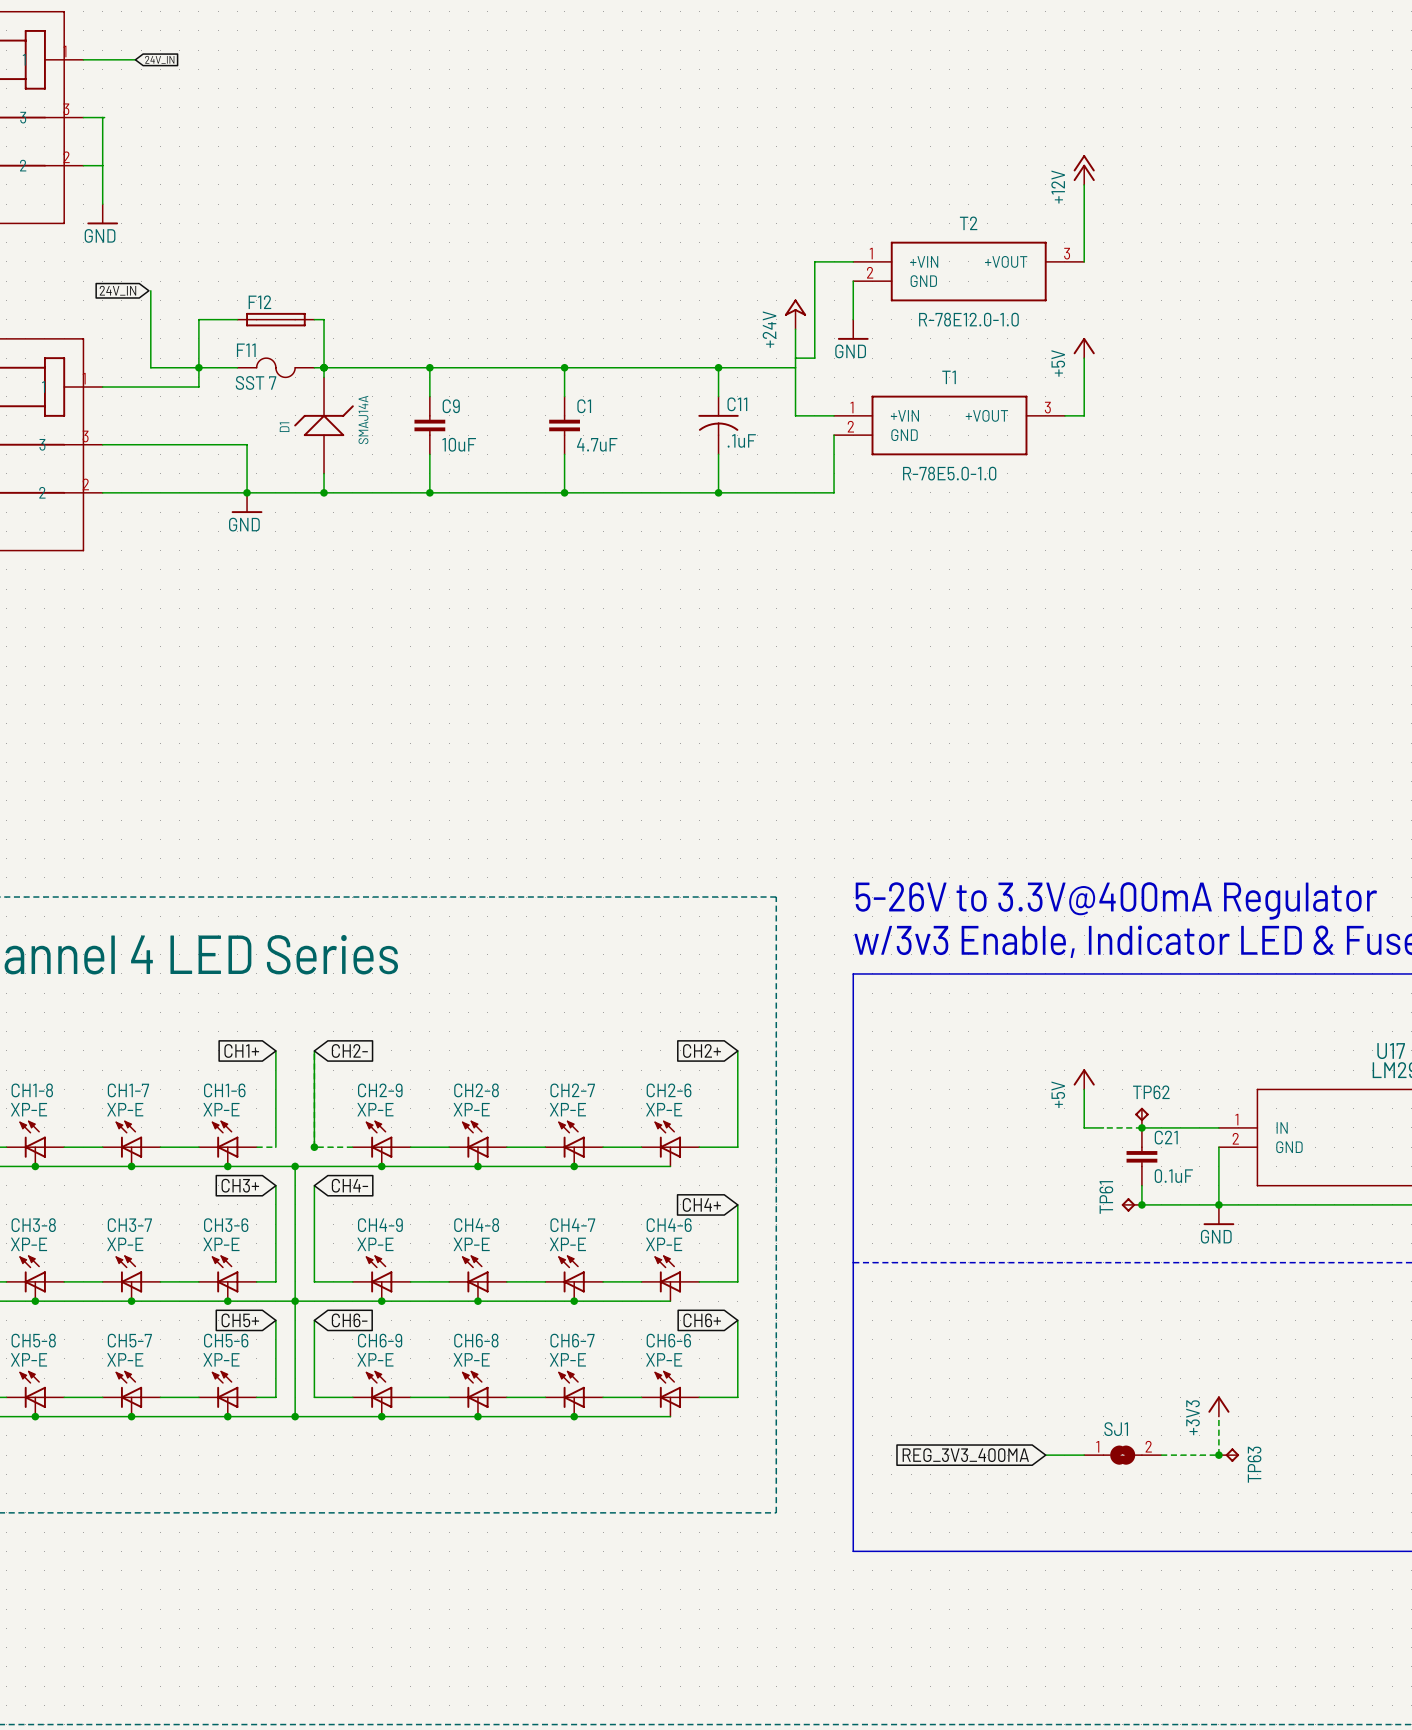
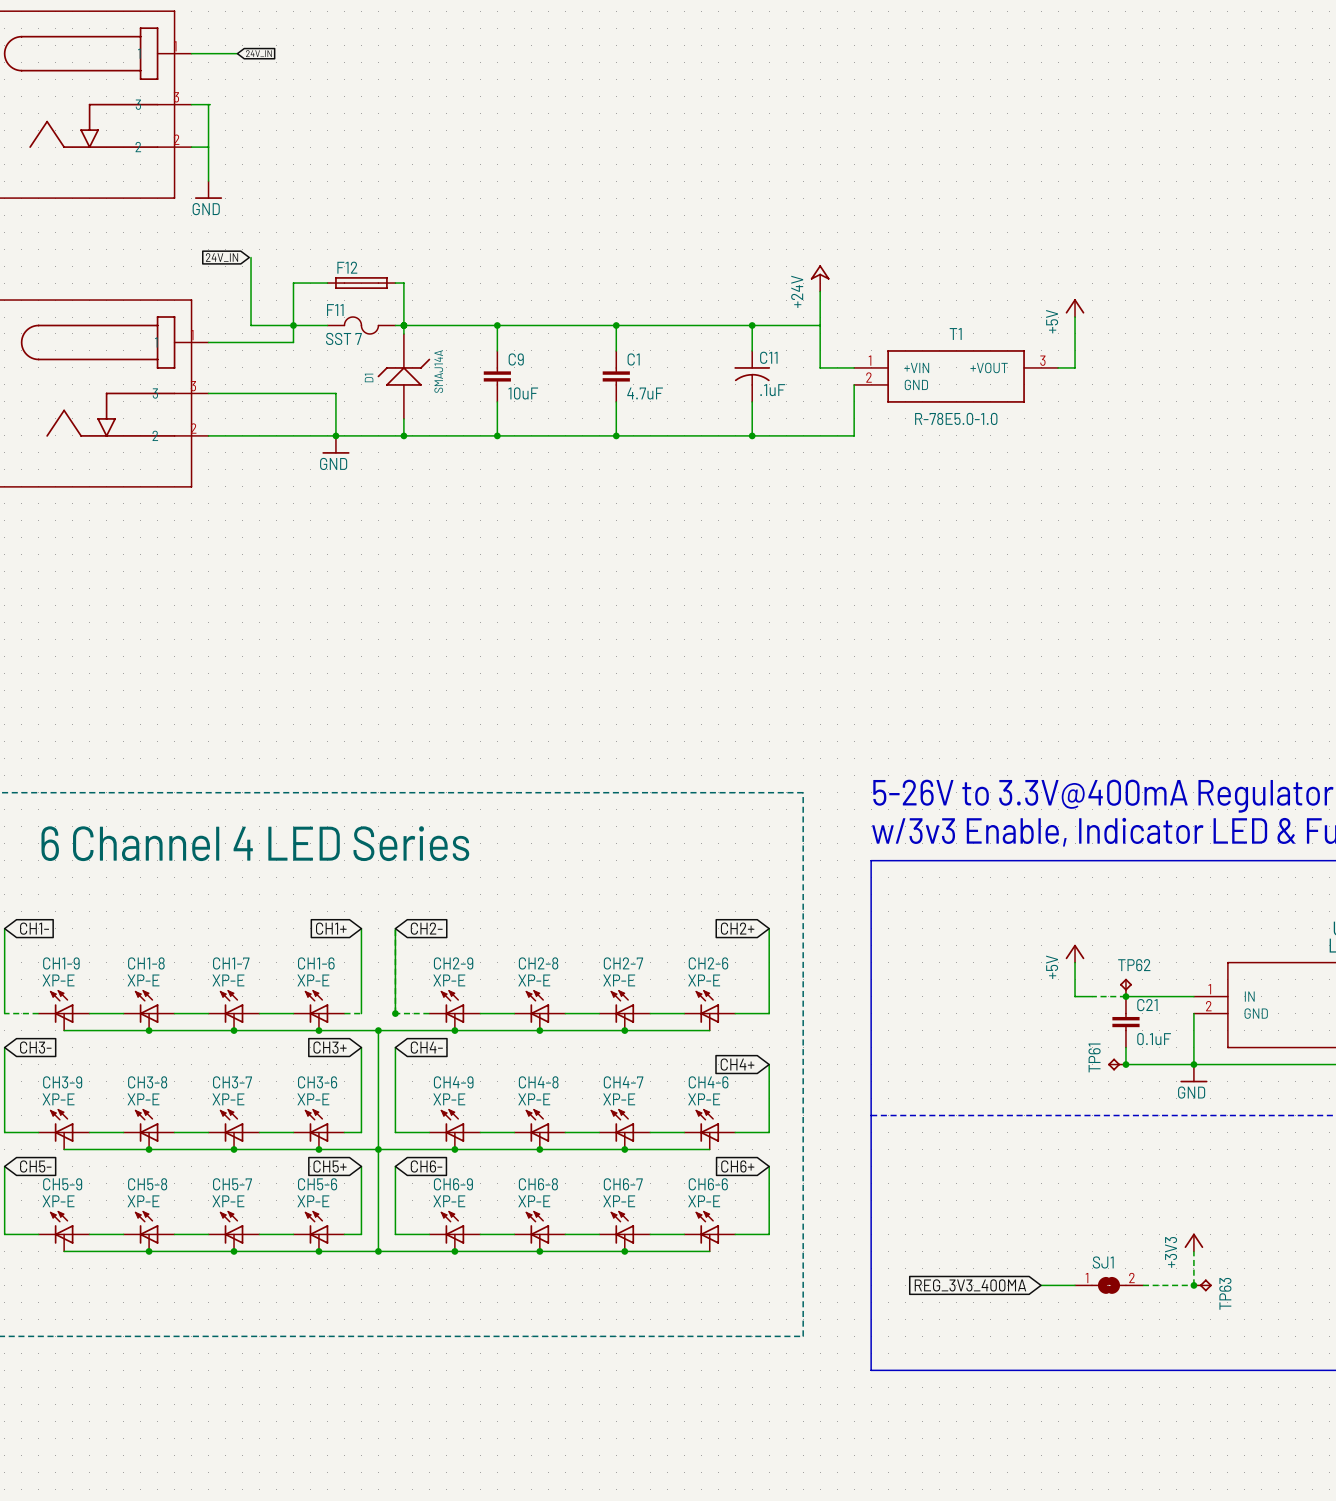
power symbol: +12V (1084, 170) -> none
wire: (1084, 184) (1084, 261) -> none
wire: (853, 261) (814, 261) (814, 358) (795, 358) -> none
T2: R-78E12.0-1.0 (968, 271) -> none
wire: (853, 281) (853, 319) -> none
power symbol: GND (853, 329) -> none

